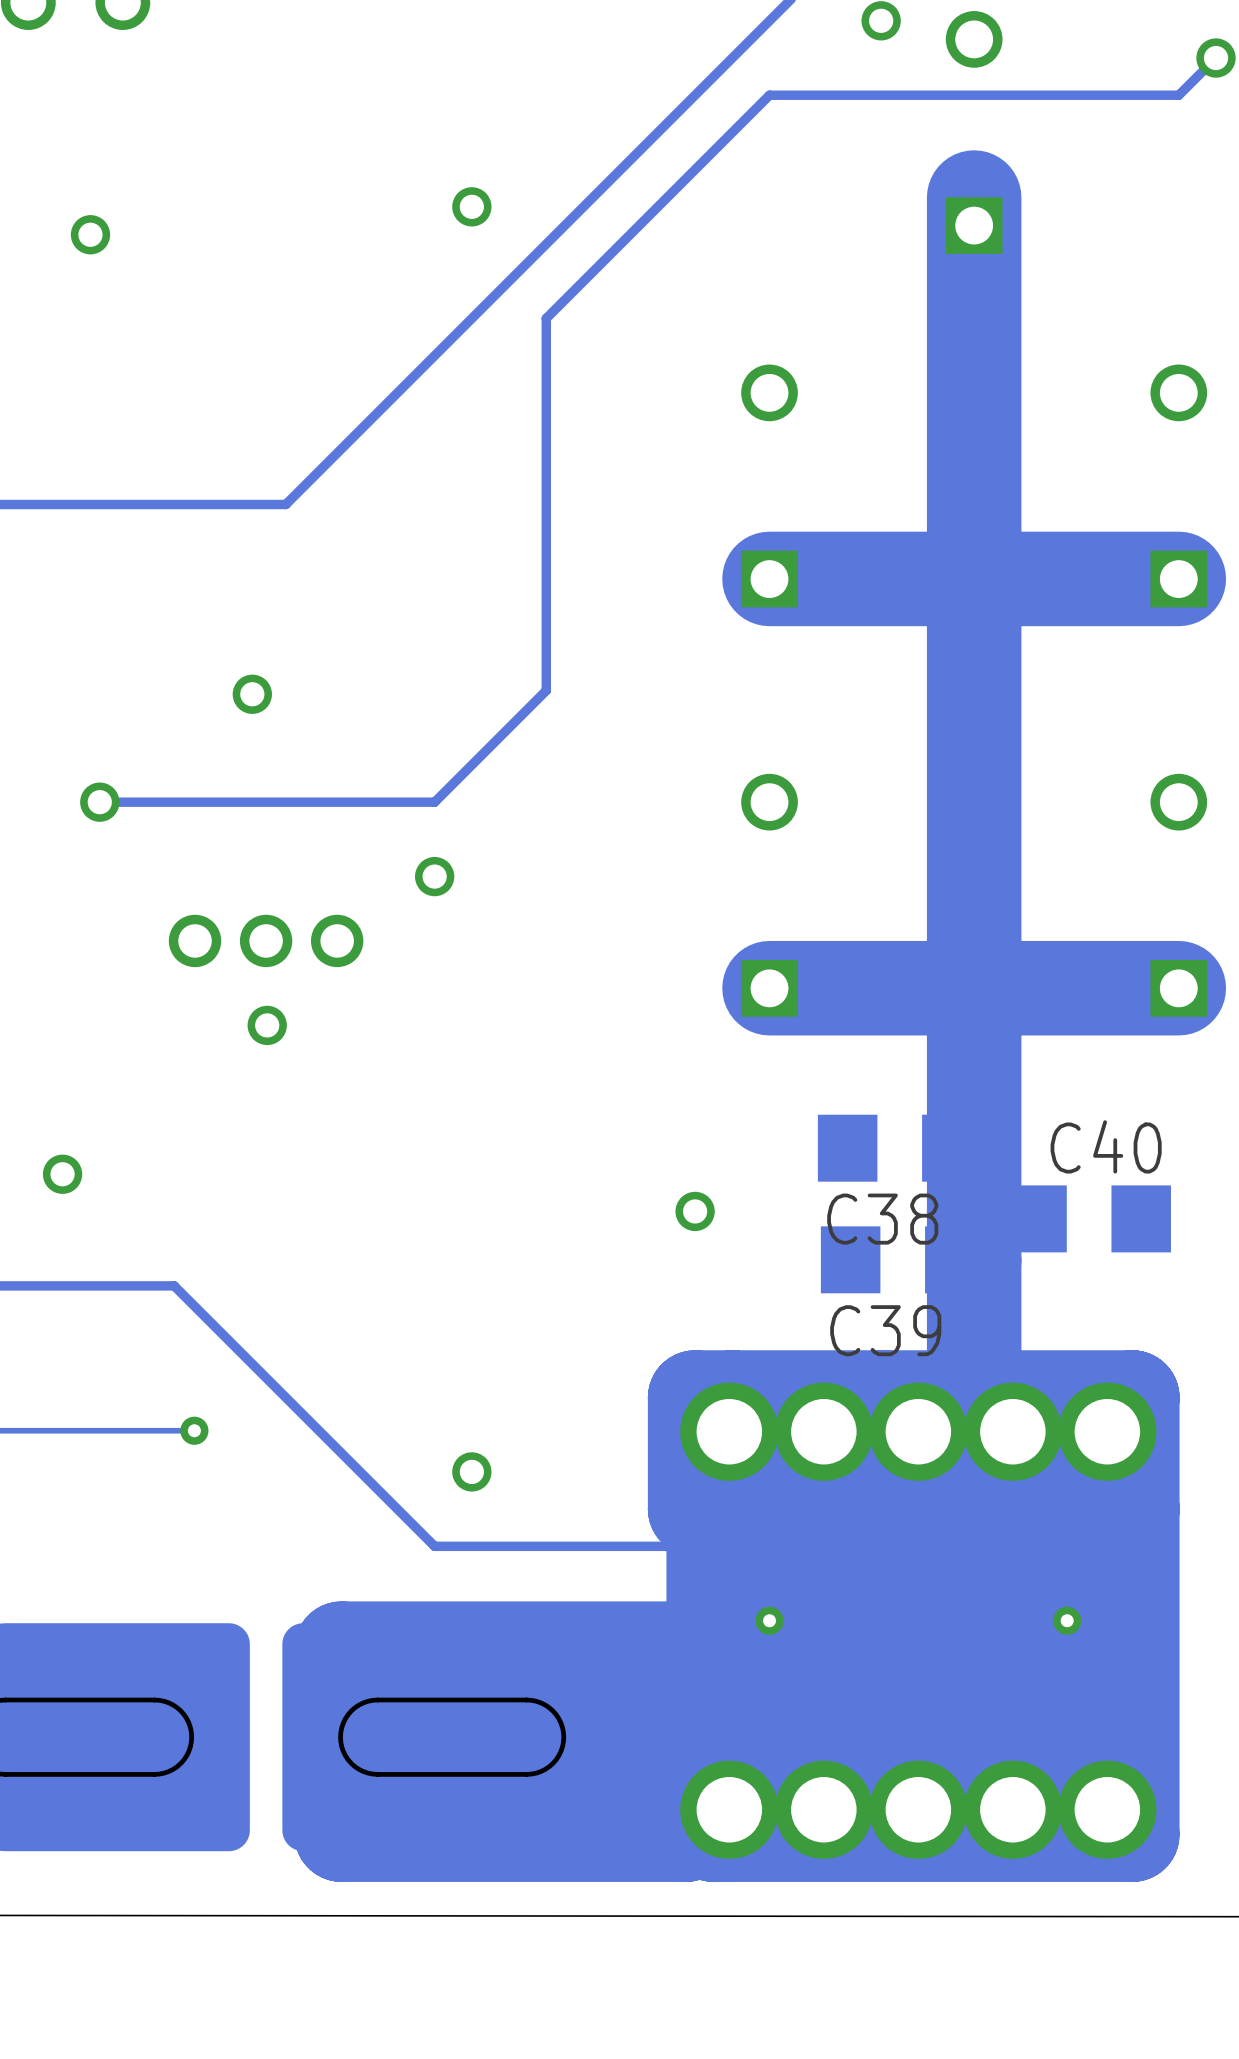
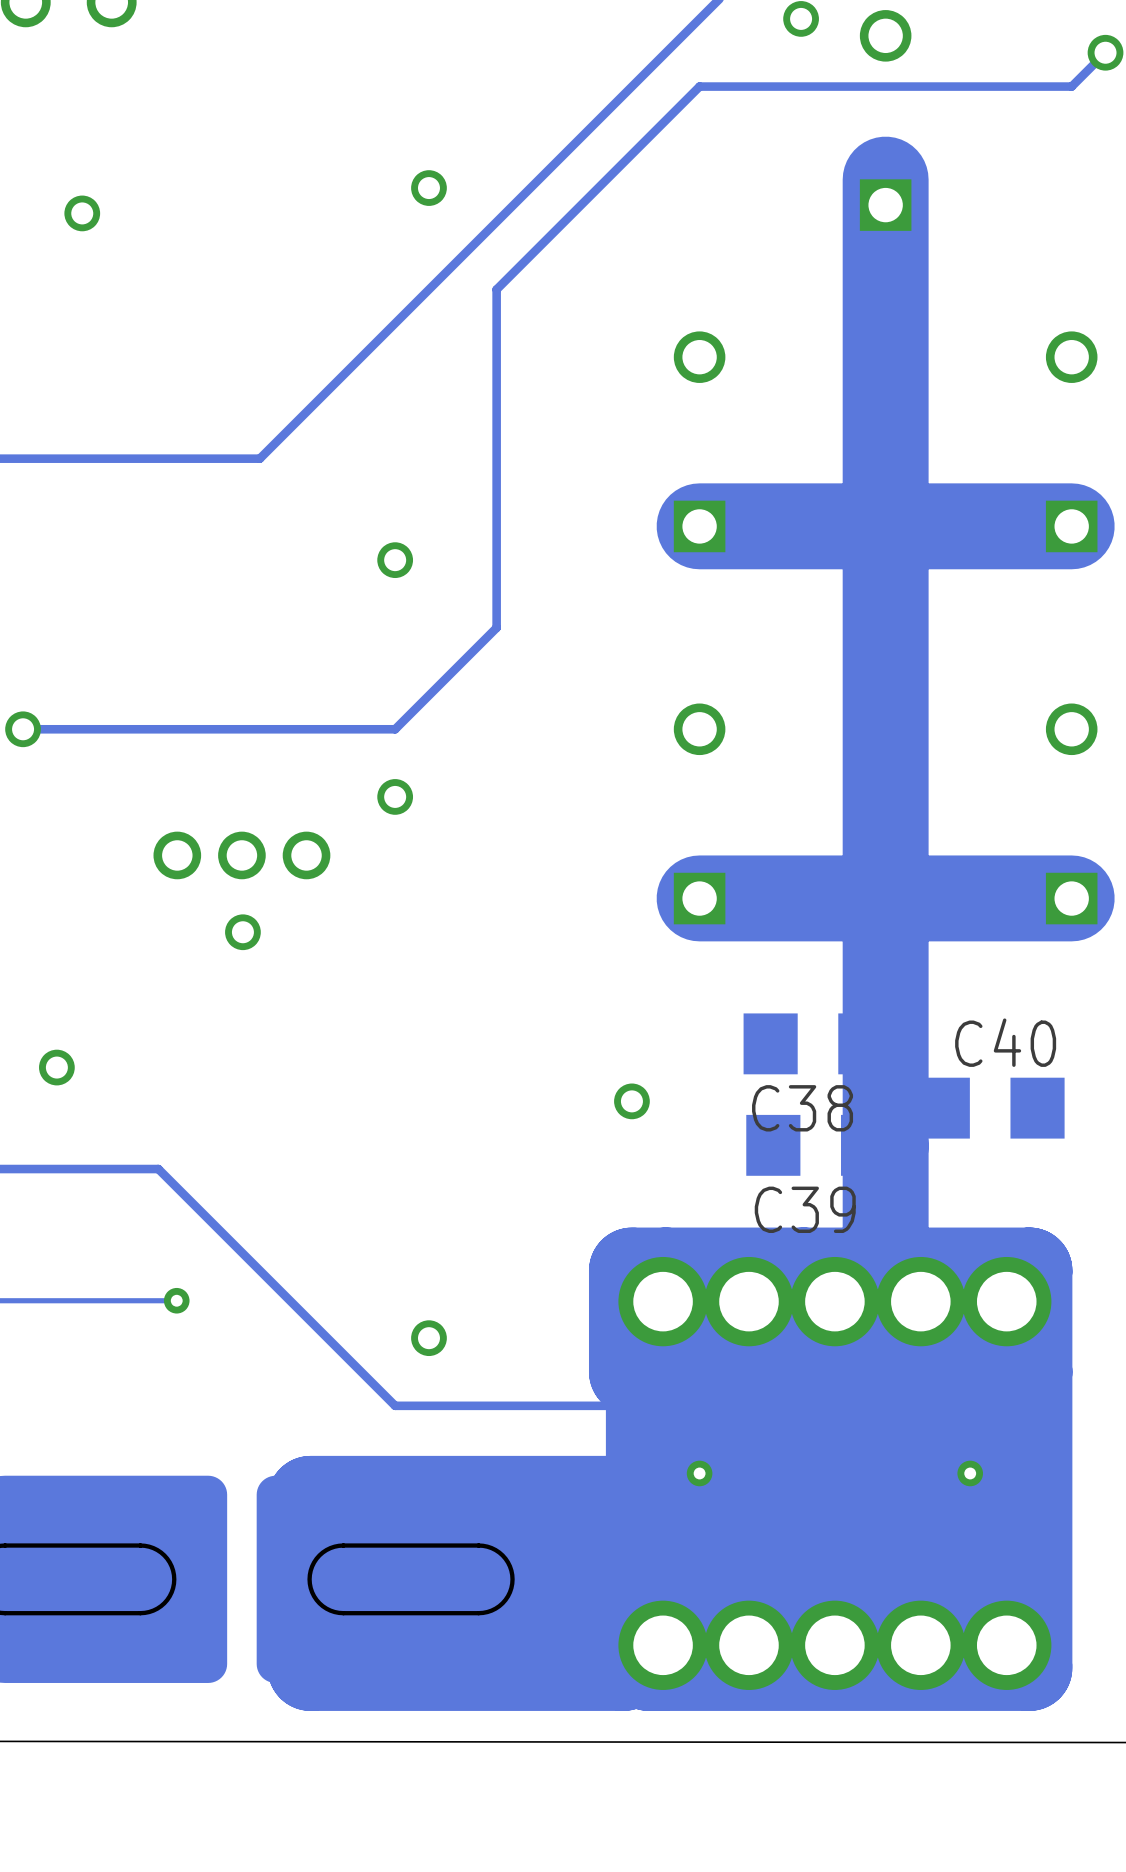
via: none -> (395, 560)
via: (252, 694) -> none
track: none -> (90, 729) (23, 729)
via position: (99, 802) -> (23, 729)

